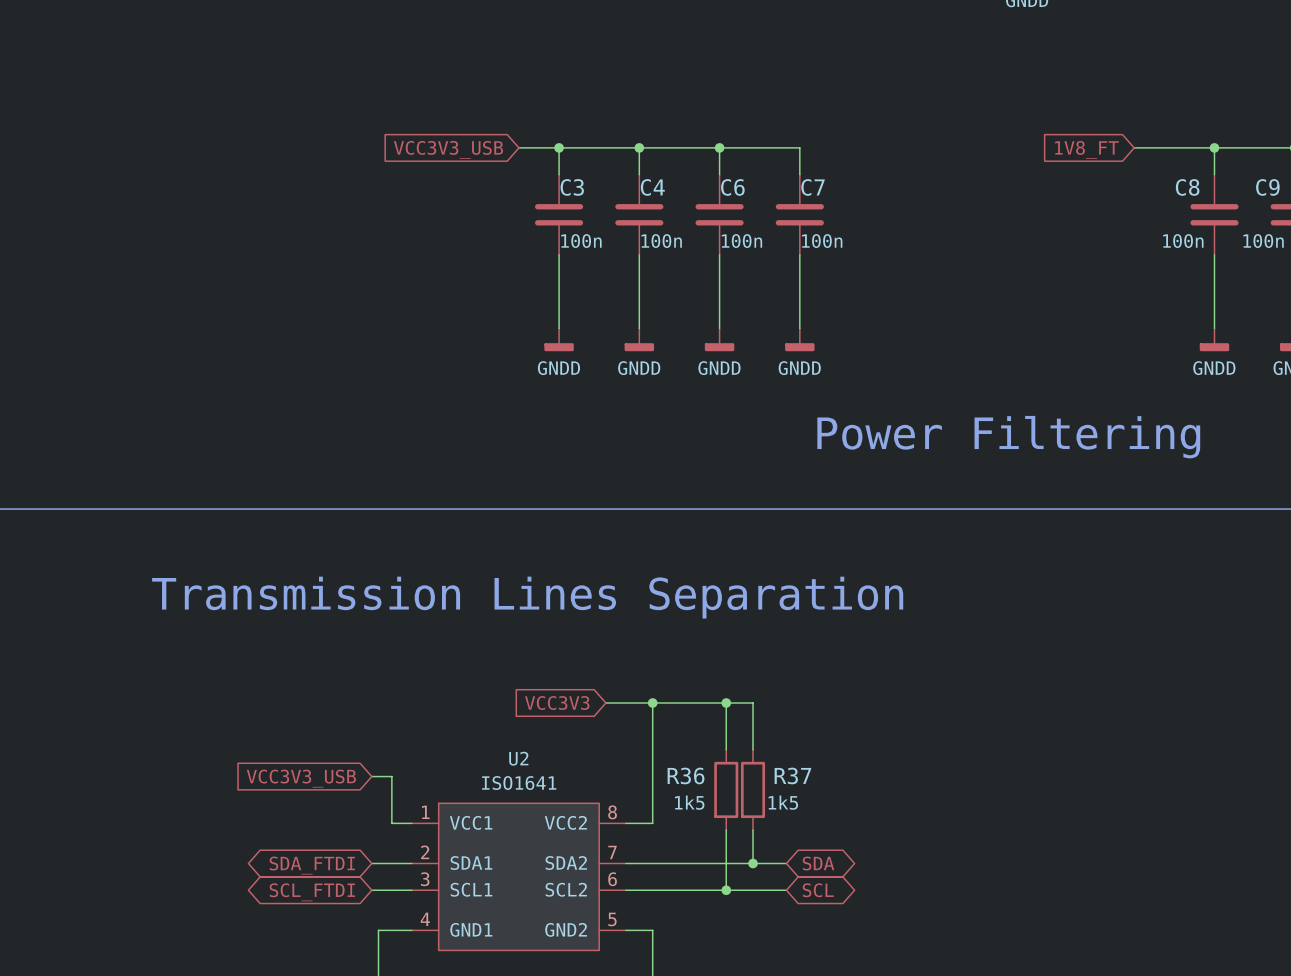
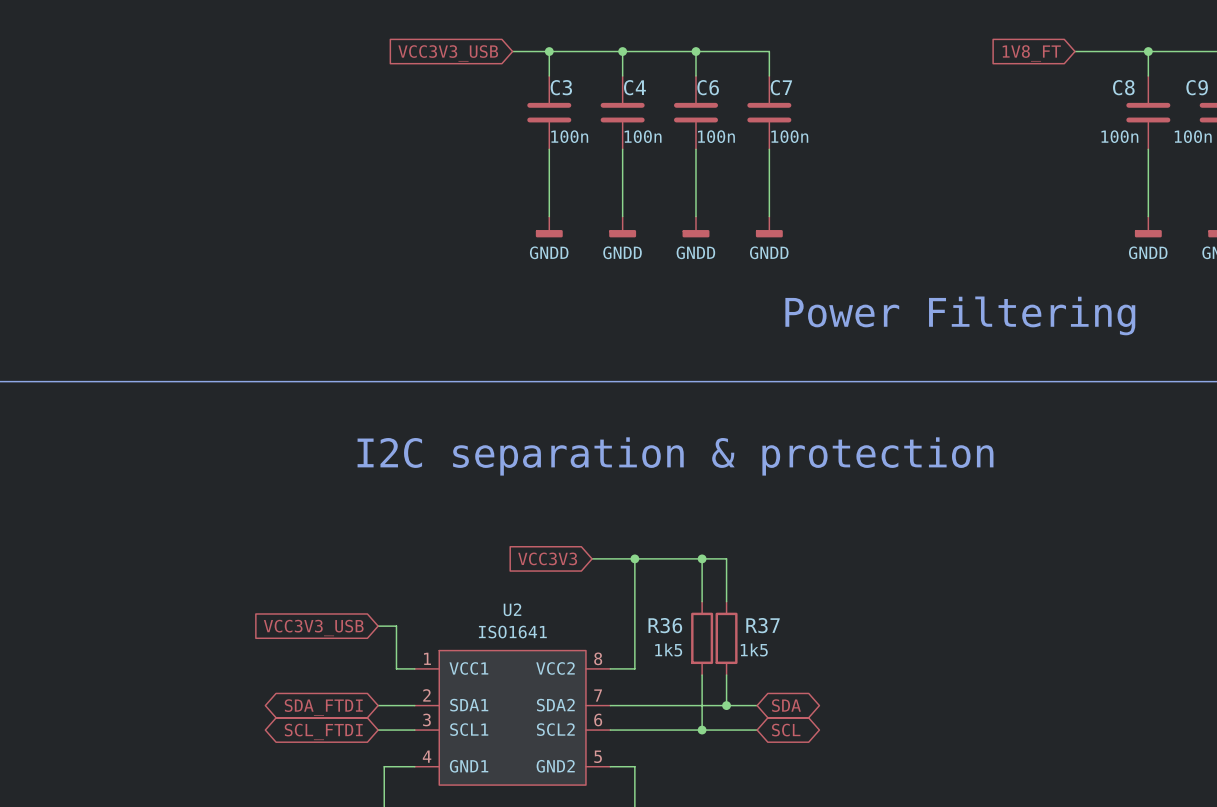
text: none -> I2C separation & protection (675, 456)
text: Transmission Lines Separation (527, 597) -> none

